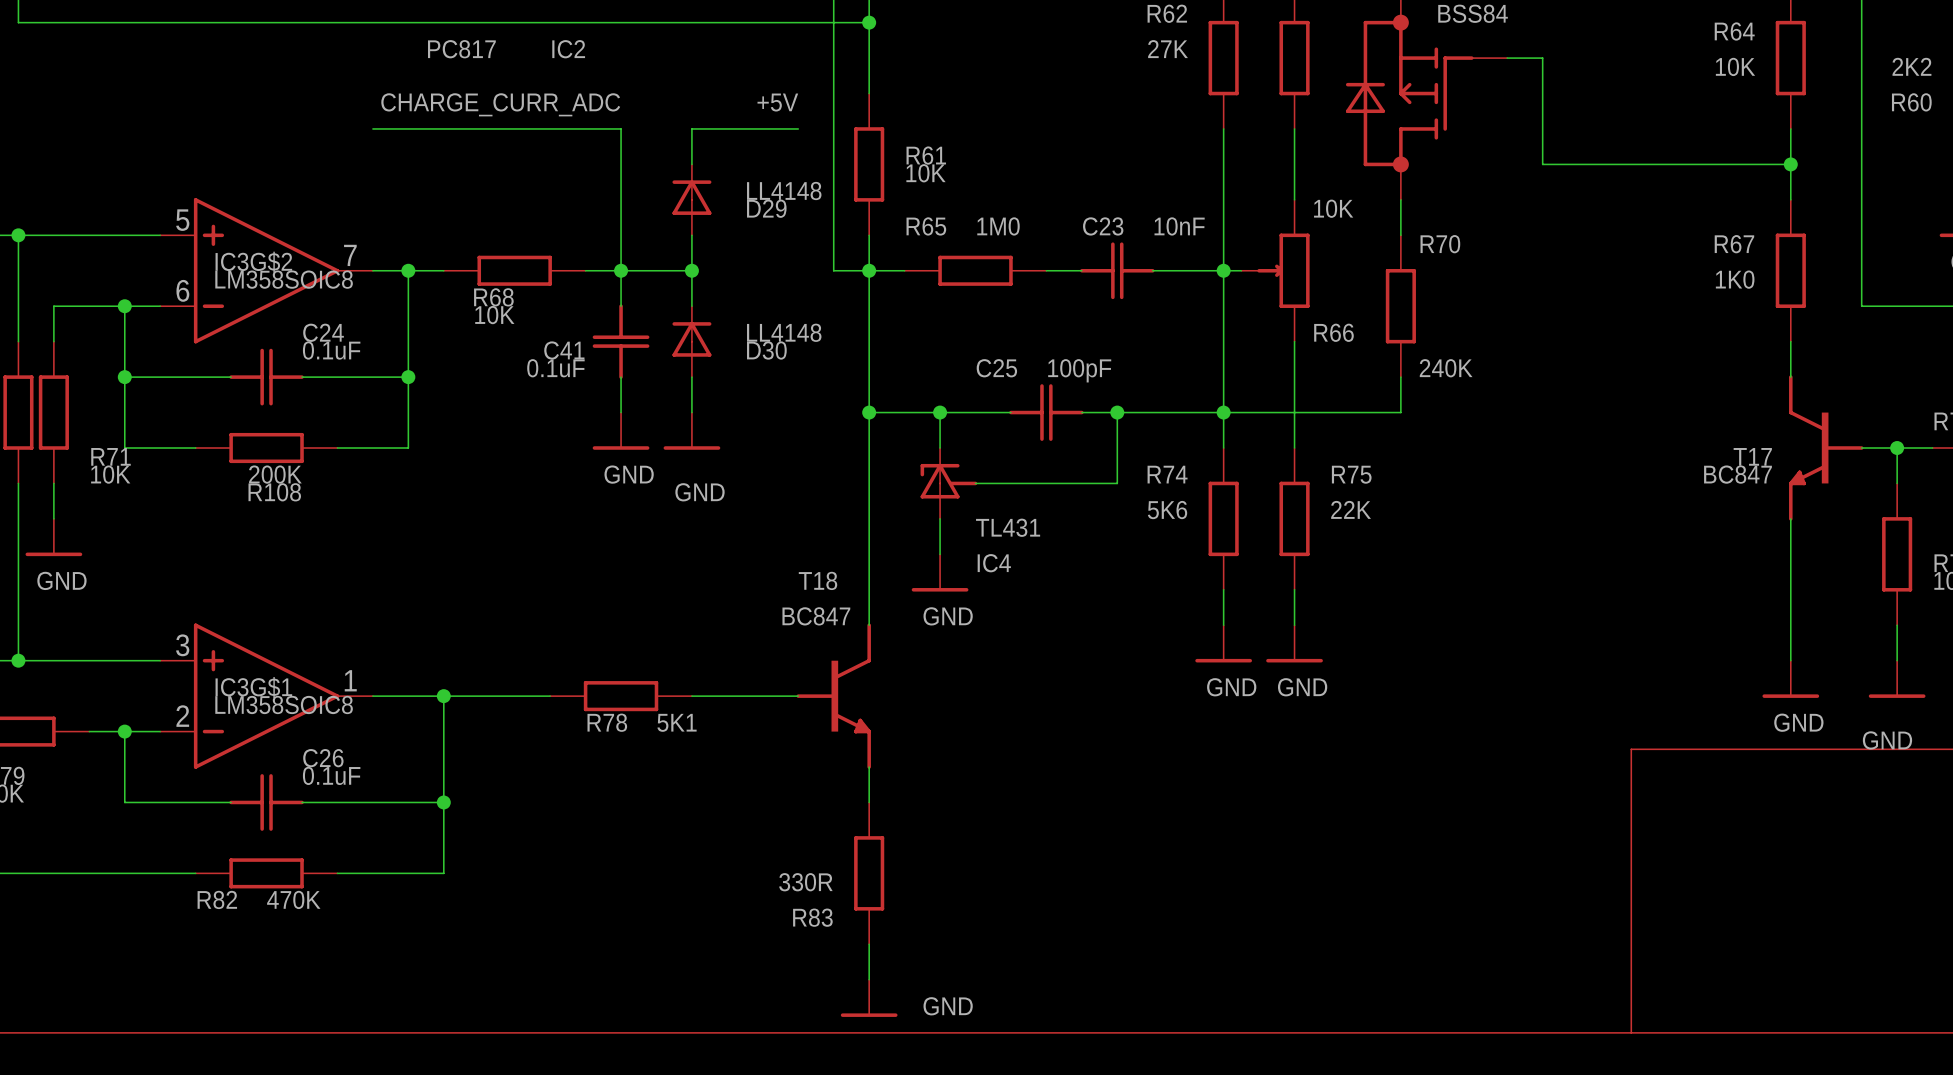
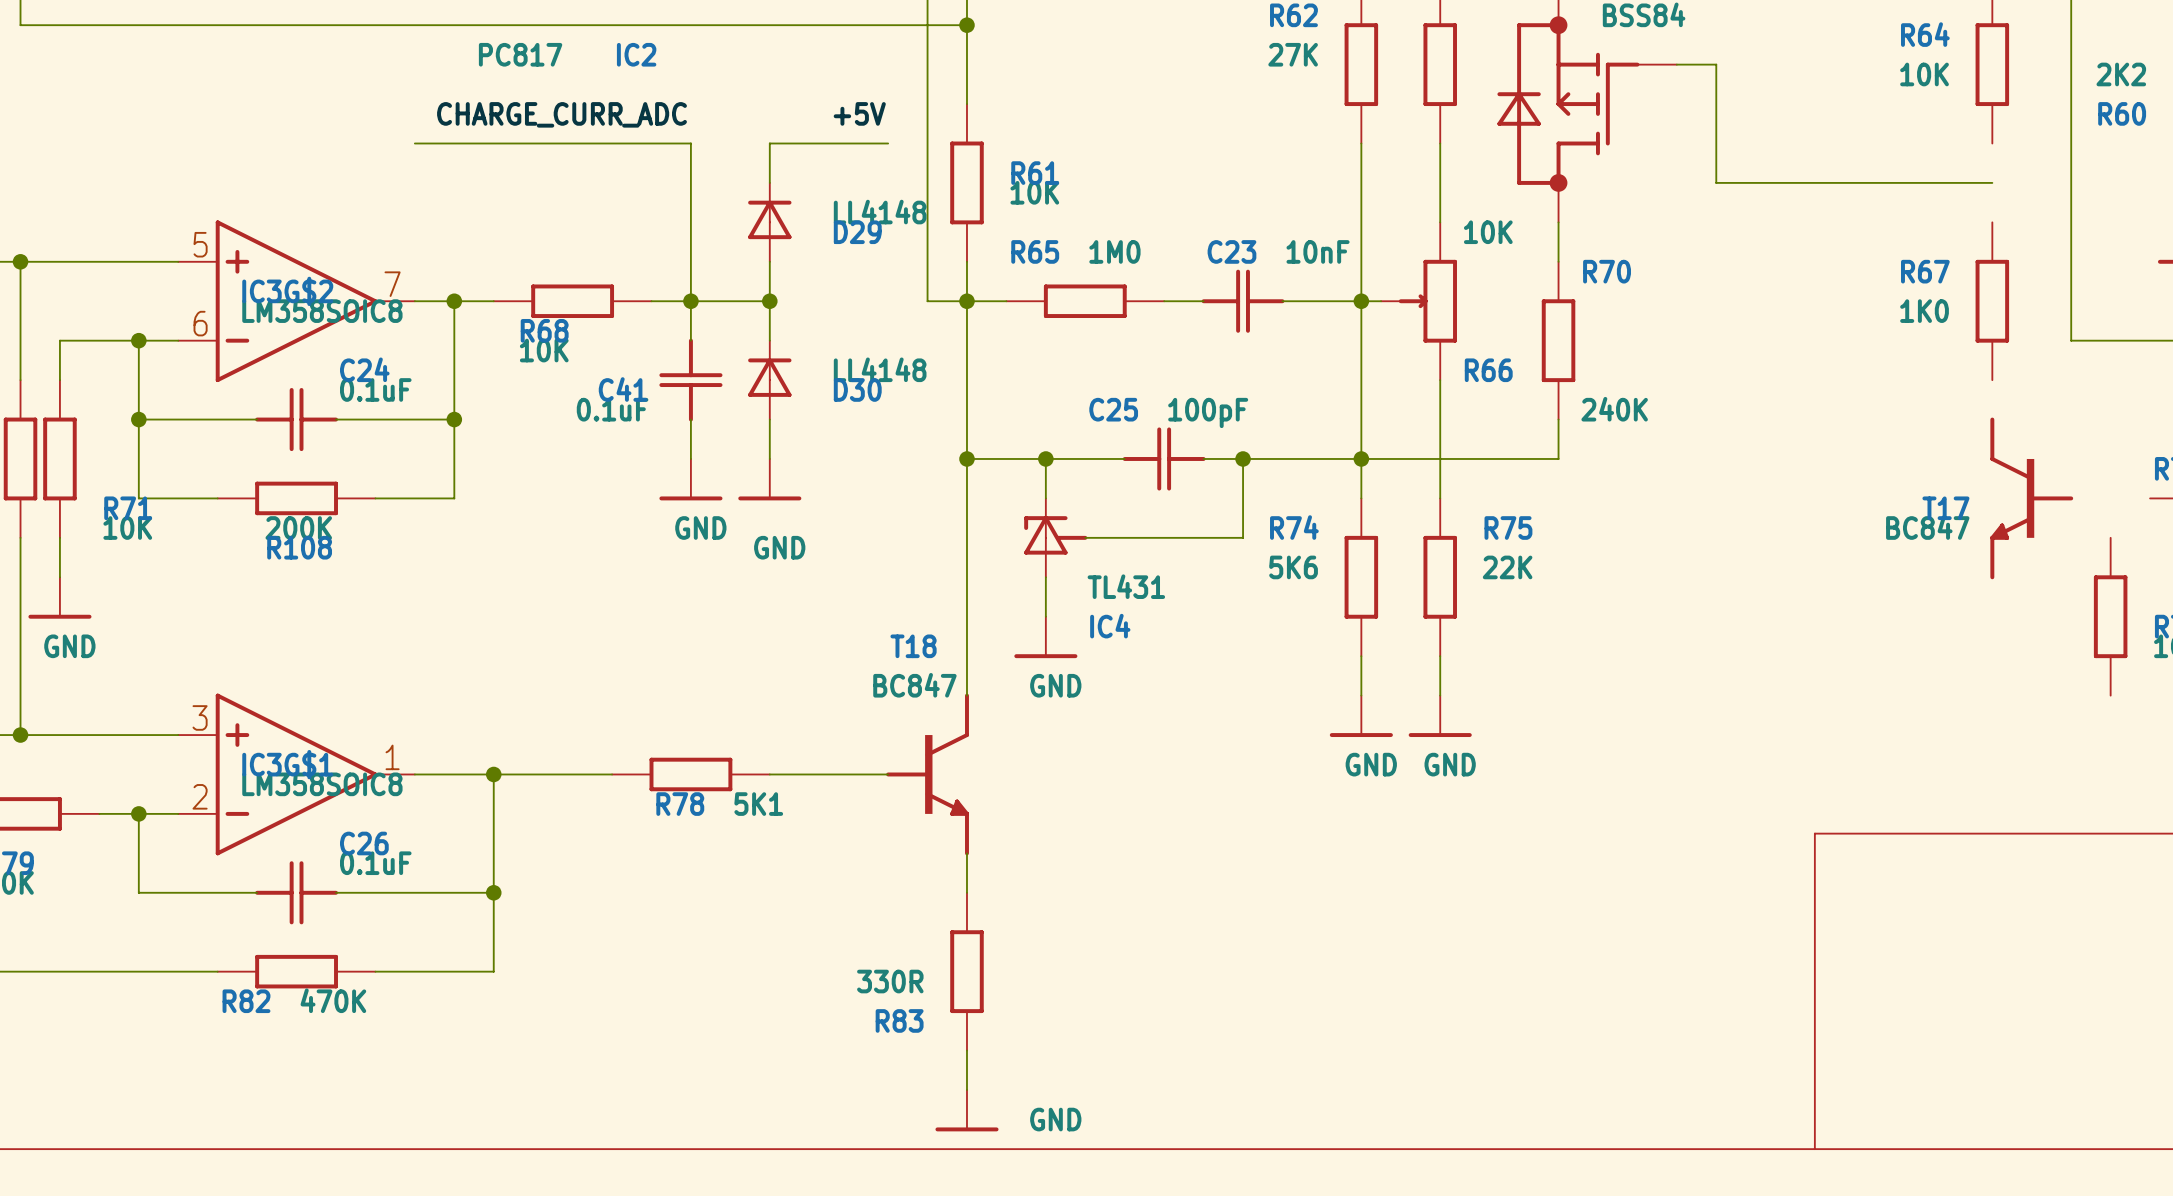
wire: (1790, 128) (1790, 199) -> none
junction: (1790, 164) -> none
wire: (1790, 341) (1790, 377) -> none
wire: (1861, 448) (1932, 448) -> none
wire: (1897, 448) (1897, 483) -> none
junction: (1897, 448) -> none
wire: (1790, 518) (1790, 660) -> none
wire: (1897, 625) (1897, 660) -> none
power symbol: GND (1790, 679) -> none
power symbol: GND (1897, 679) -> none

